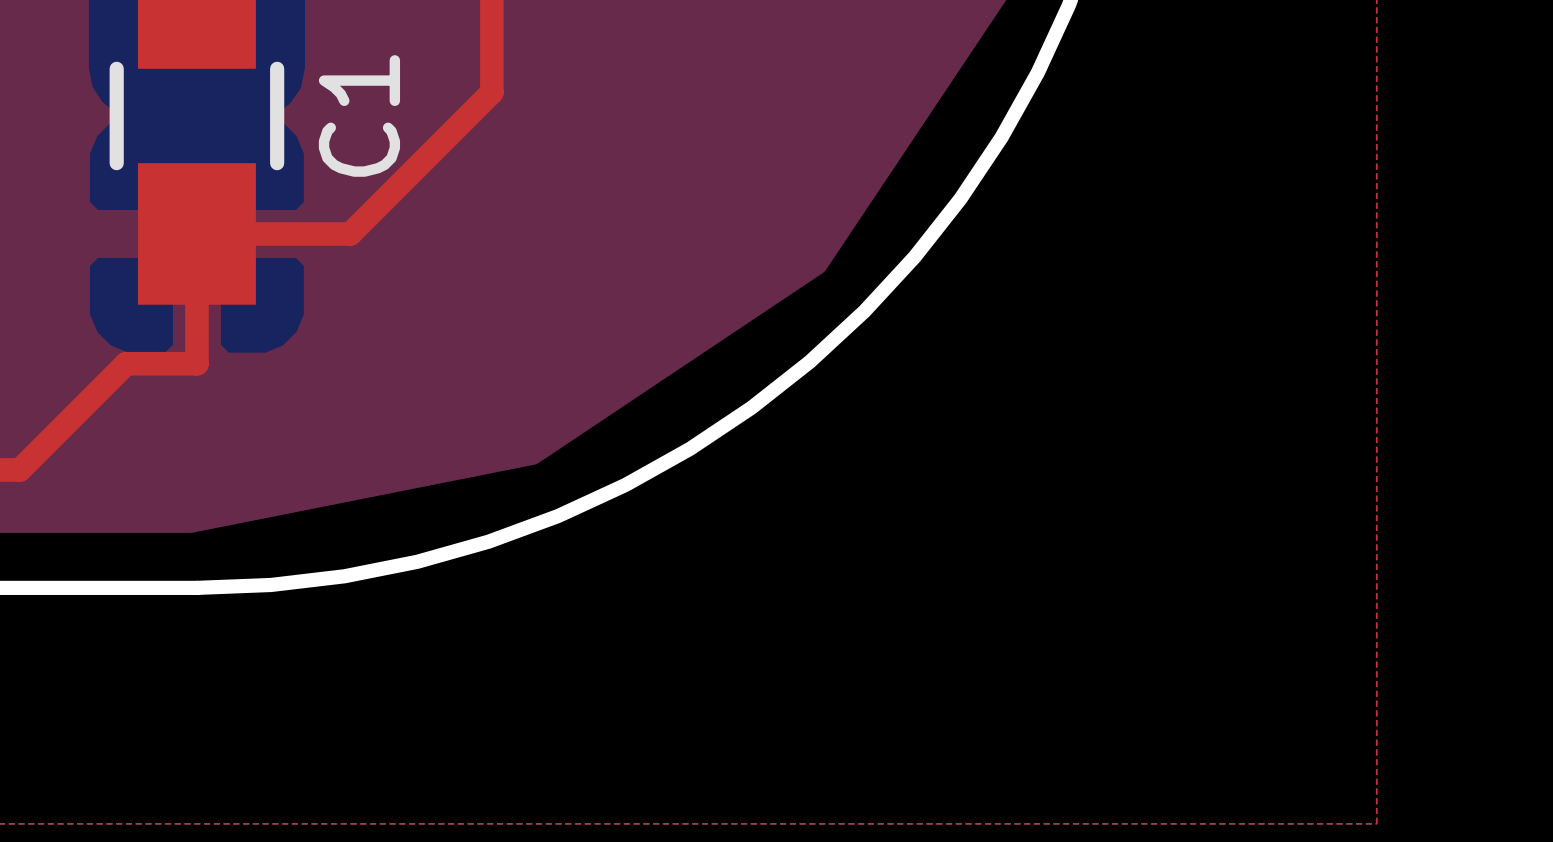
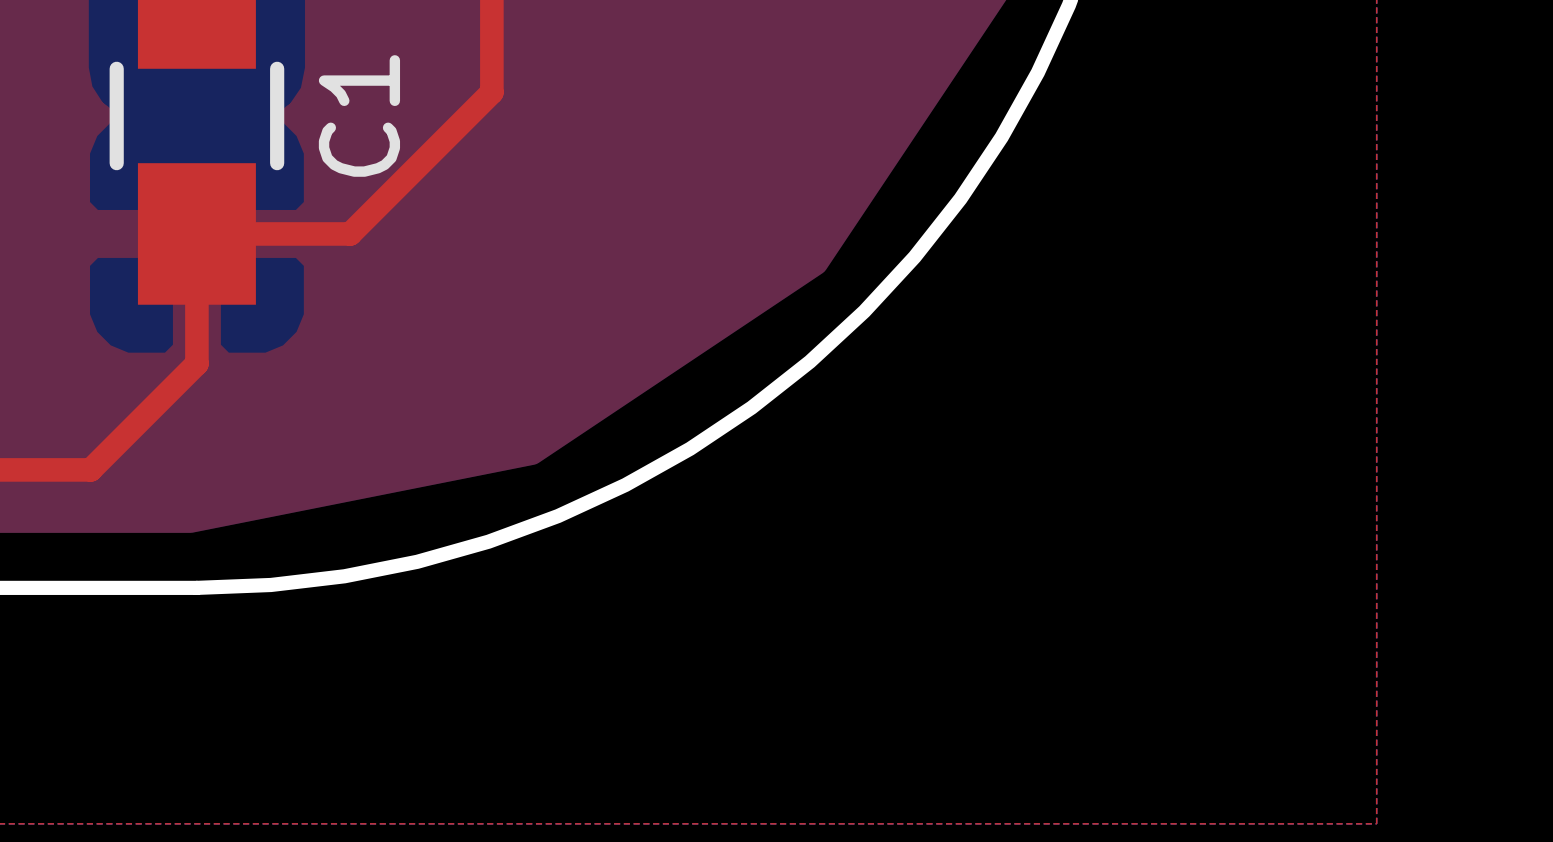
top track: (196, 363) (126, 363) (19, 469) -> (196, 363) (90, 469) (19, 469)

